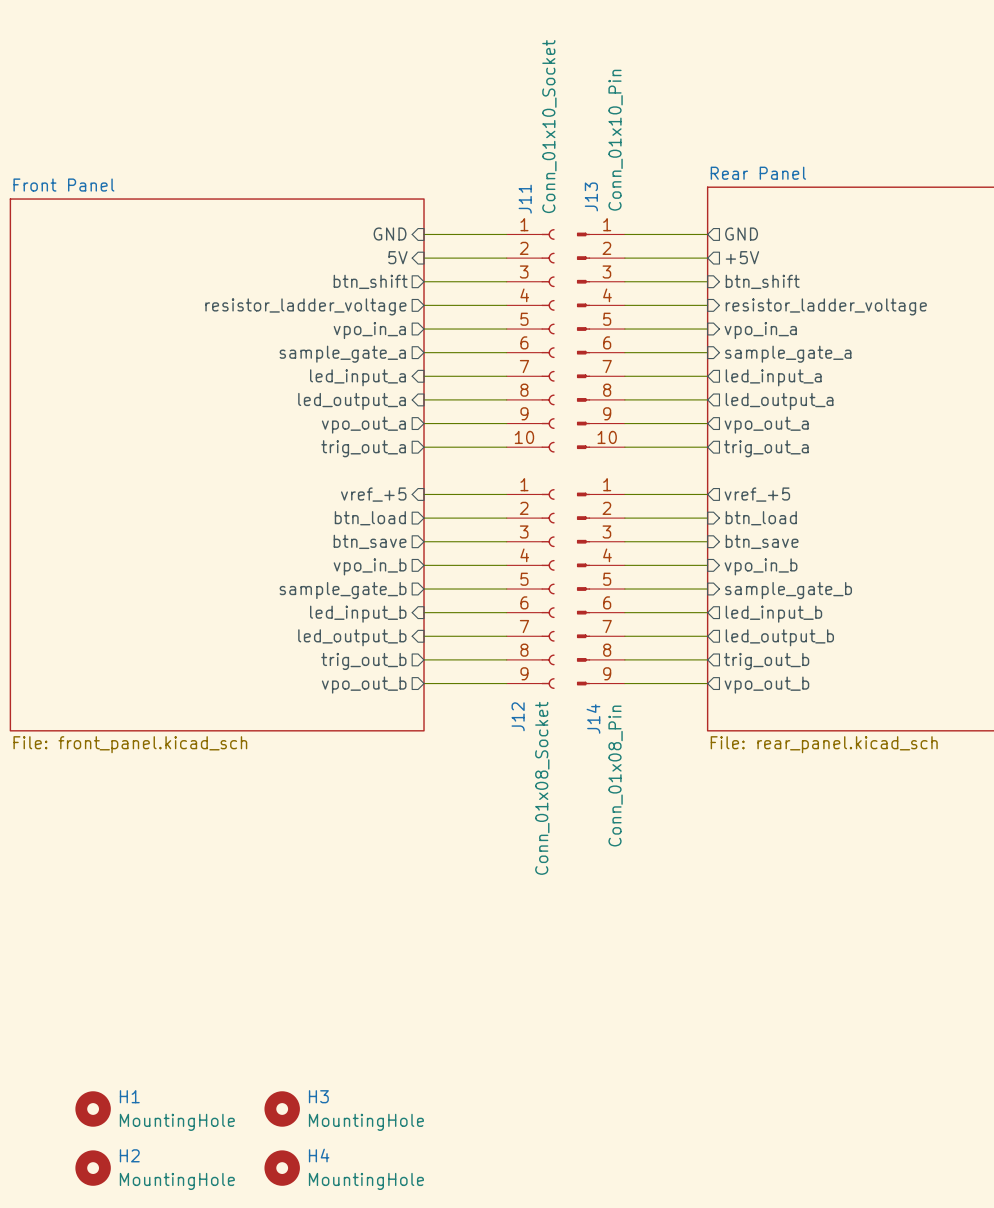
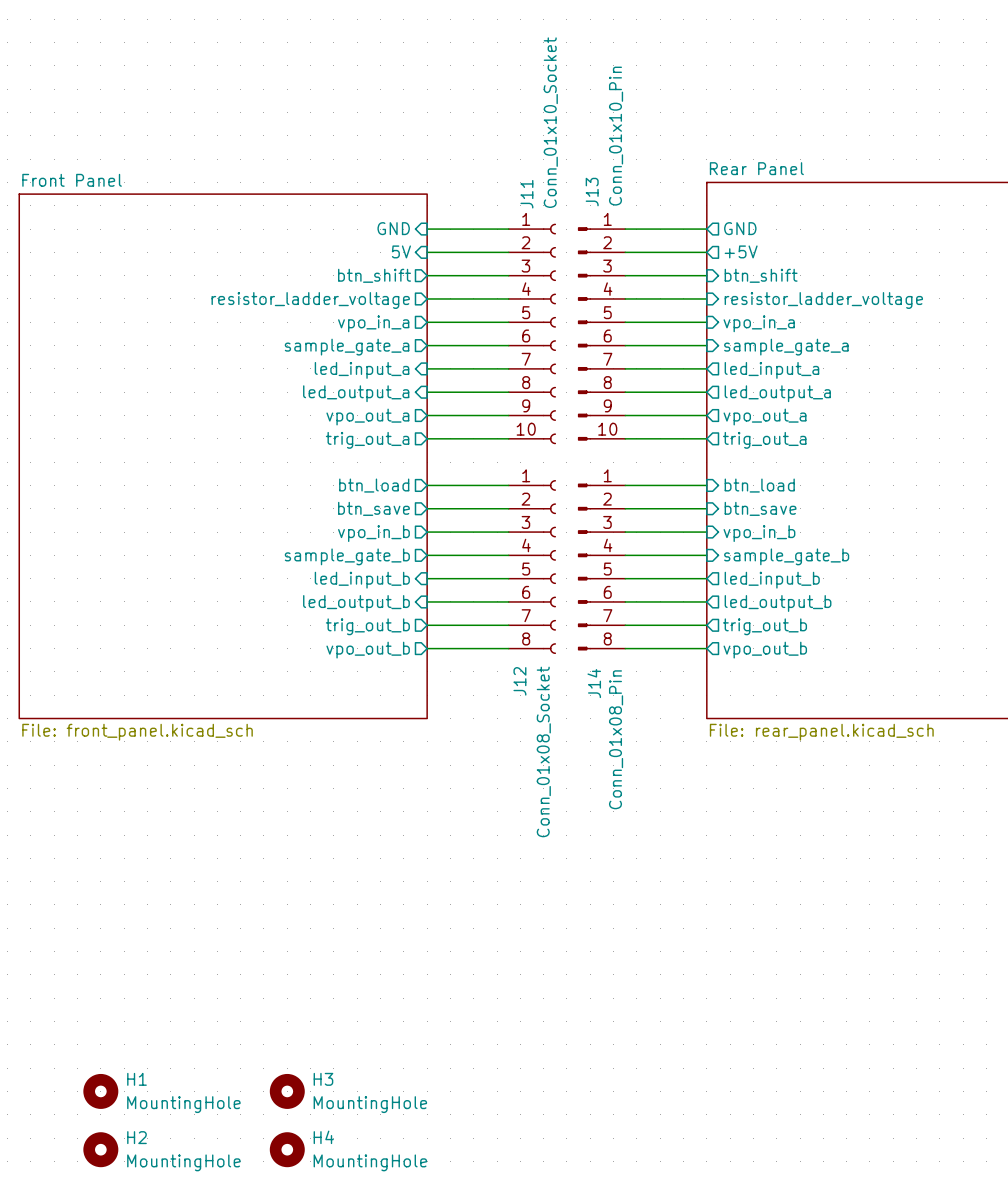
J12 symbol: [506, 489, 555, 689] -> [508, 480, 557, 654]
J14 symbol: [576, 492, 625, 686] -> [577, 483, 626, 651]
sheet pin shape: input (373, 494) -> output (374, 485)
sheet pin: vref_+5 (373, 494) -> btn_load (374, 485)
sheet pin shape: output (757, 494) -> input (759, 485)
sheet pin: vref_+5 (757, 494) -> btn_load (759, 485)
sheet pin: btn_load (370, 518) -> btn_save (373, 508)
sheet pin: btn_load (761, 518) -> btn_save (760, 508)
sheet pin: btn_save (370, 541) -> vpo_in_b (373, 533)
sheet pin: btn_save (762, 541) -> vpo_in_b (759, 533)
sheet pin: vpo_in_b (370, 566) -> sample_gate_b (347, 556)
sheet pin: vpo_in_b (760, 566) -> sample_gate_b (786, 556)
sheet pin shape: output (343, 590) -> input (362, 580)
sheet pin: sample_gate_b (343, 590) -> led_input_b (362, 580)
sheet pin shape: input (788, 590) -> output (772, 580)
sheet pin: sample_gate_b (788, 590) -> led_input_b (772, 580)
sheet pin: led_input_b (358, 614) -> led_output_b (356, 603)
sheet pin: led_input_b (773, 614) -> led_output_b (778, 603)
sheet pin shape: input (352, 637) -> output (367, 626)
sheet pin: led_output_b (352, 637) -> trig_out_b (367, 626)
sheet pin: led_output_b (779, 637) -> trig_out_b (765, 626)
sheet pin: trig_out_b (363, 661) -> vpo_out_b (368, 650)
sheet pin: trig_out_b (766, 661) -> vpo_out_b (765, 650)
wire: (424, 683) (506, 683) -> none
wire: (624, 683) (707, 683) -> none
sheet pin: vpo_out_b (364, 685) -> none
sheet pin: vpo_out_b (766, 685) -> none

